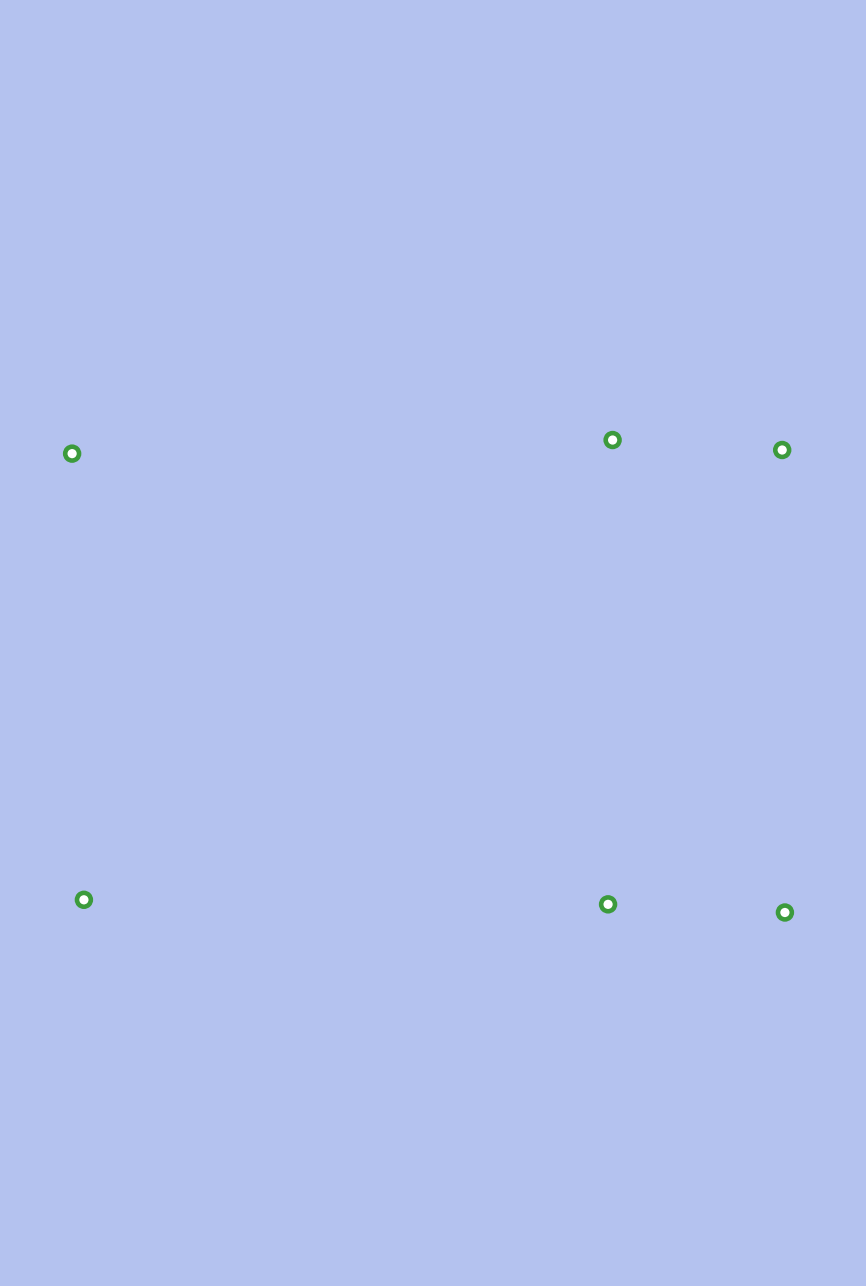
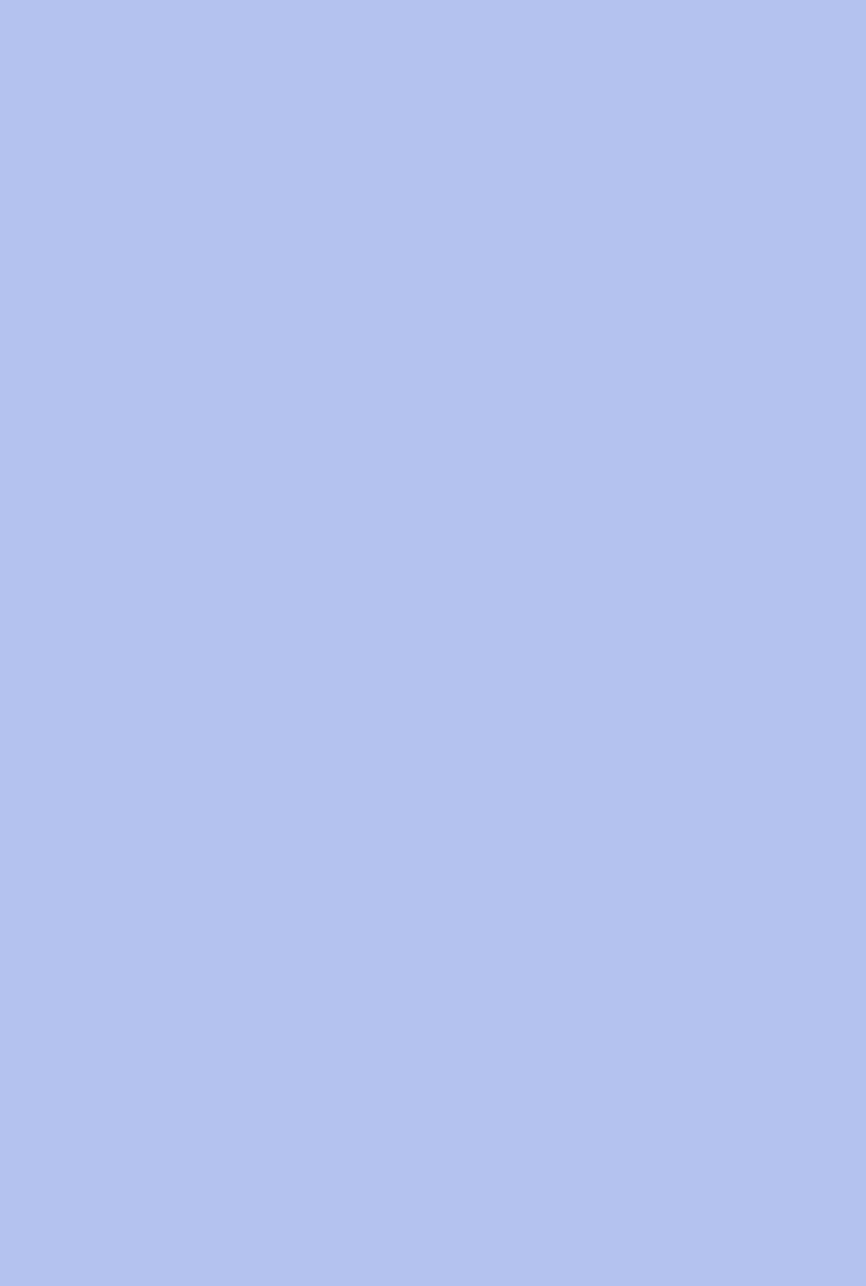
via: (612, 440) -> none
via: (782, 449) -> none
via: (72, 453) -> none
via: (83, 899) -> none
via: (608, 904) -> none
via: (784, 912) -> none

